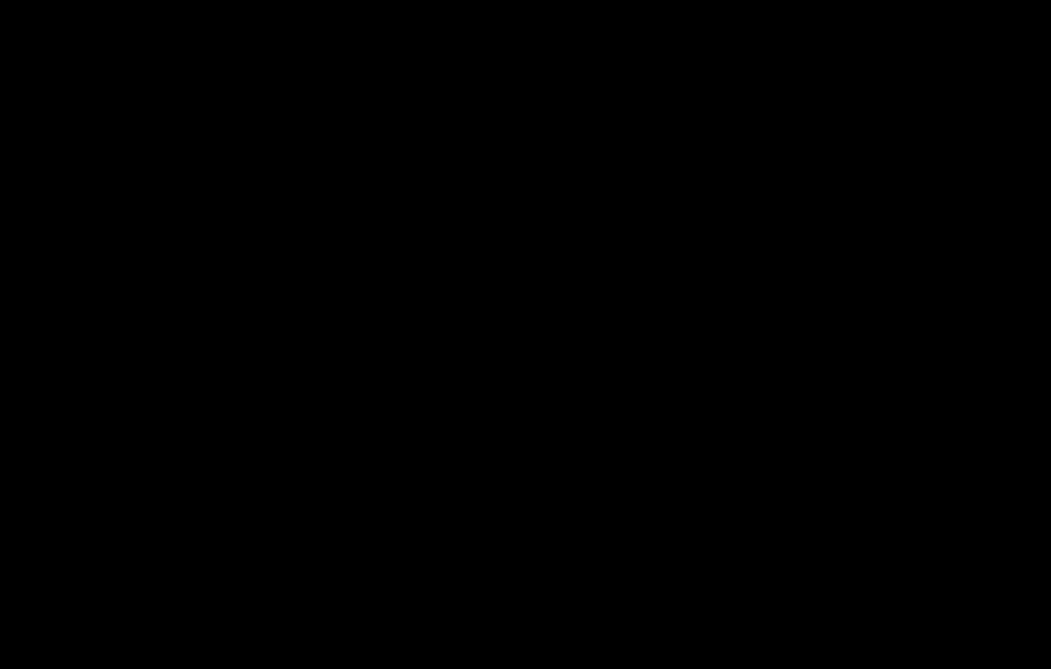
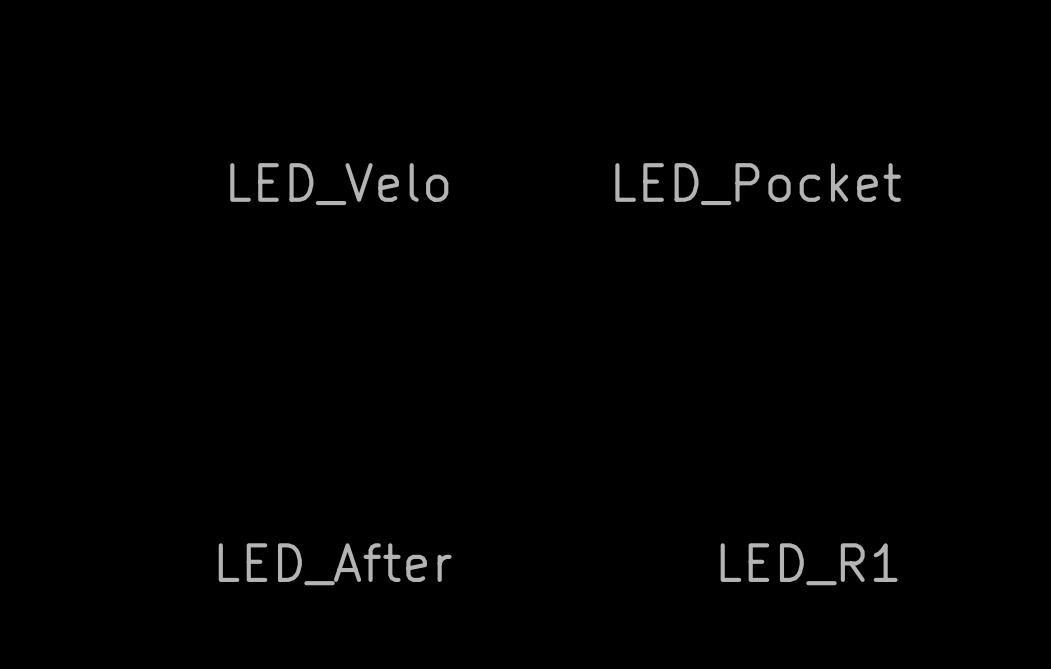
label: none -> LED_Velo (339, 184)
label: none -> LED_Pocket (758, 184)
label: none -> LED_After (335, 564)
label: none -> LED_R1 (809, 564)

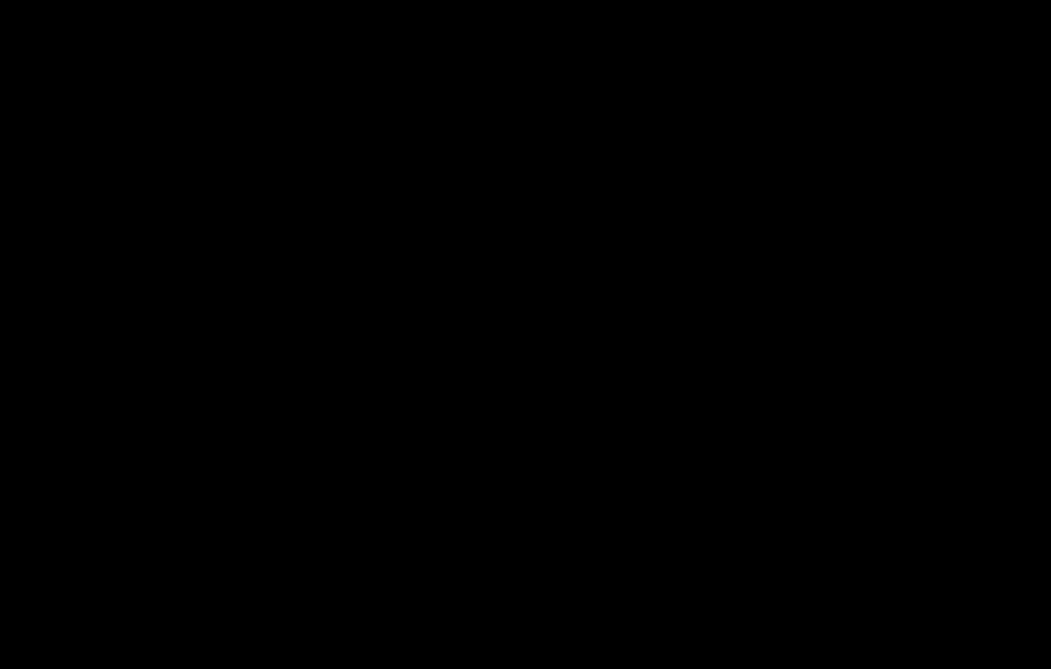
label: LED_Velo (339, 184) -> none
label: LED_Pocket (758, 184) -> none
label: LED_After (335, 564) -> none
label: LED_R1 (809, 564) -> none

